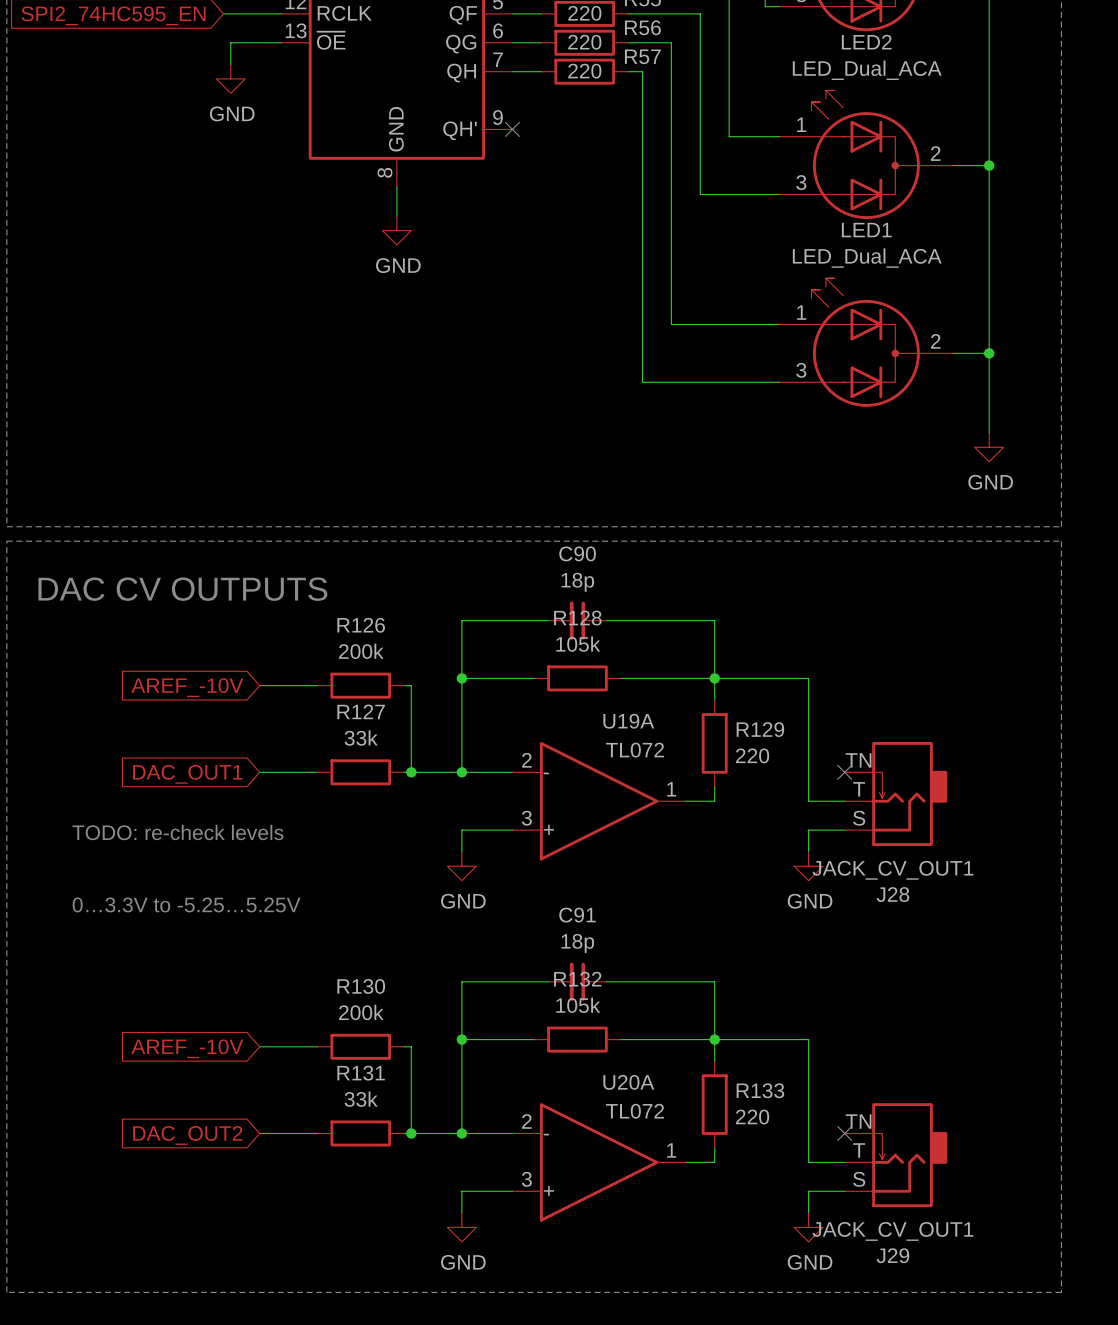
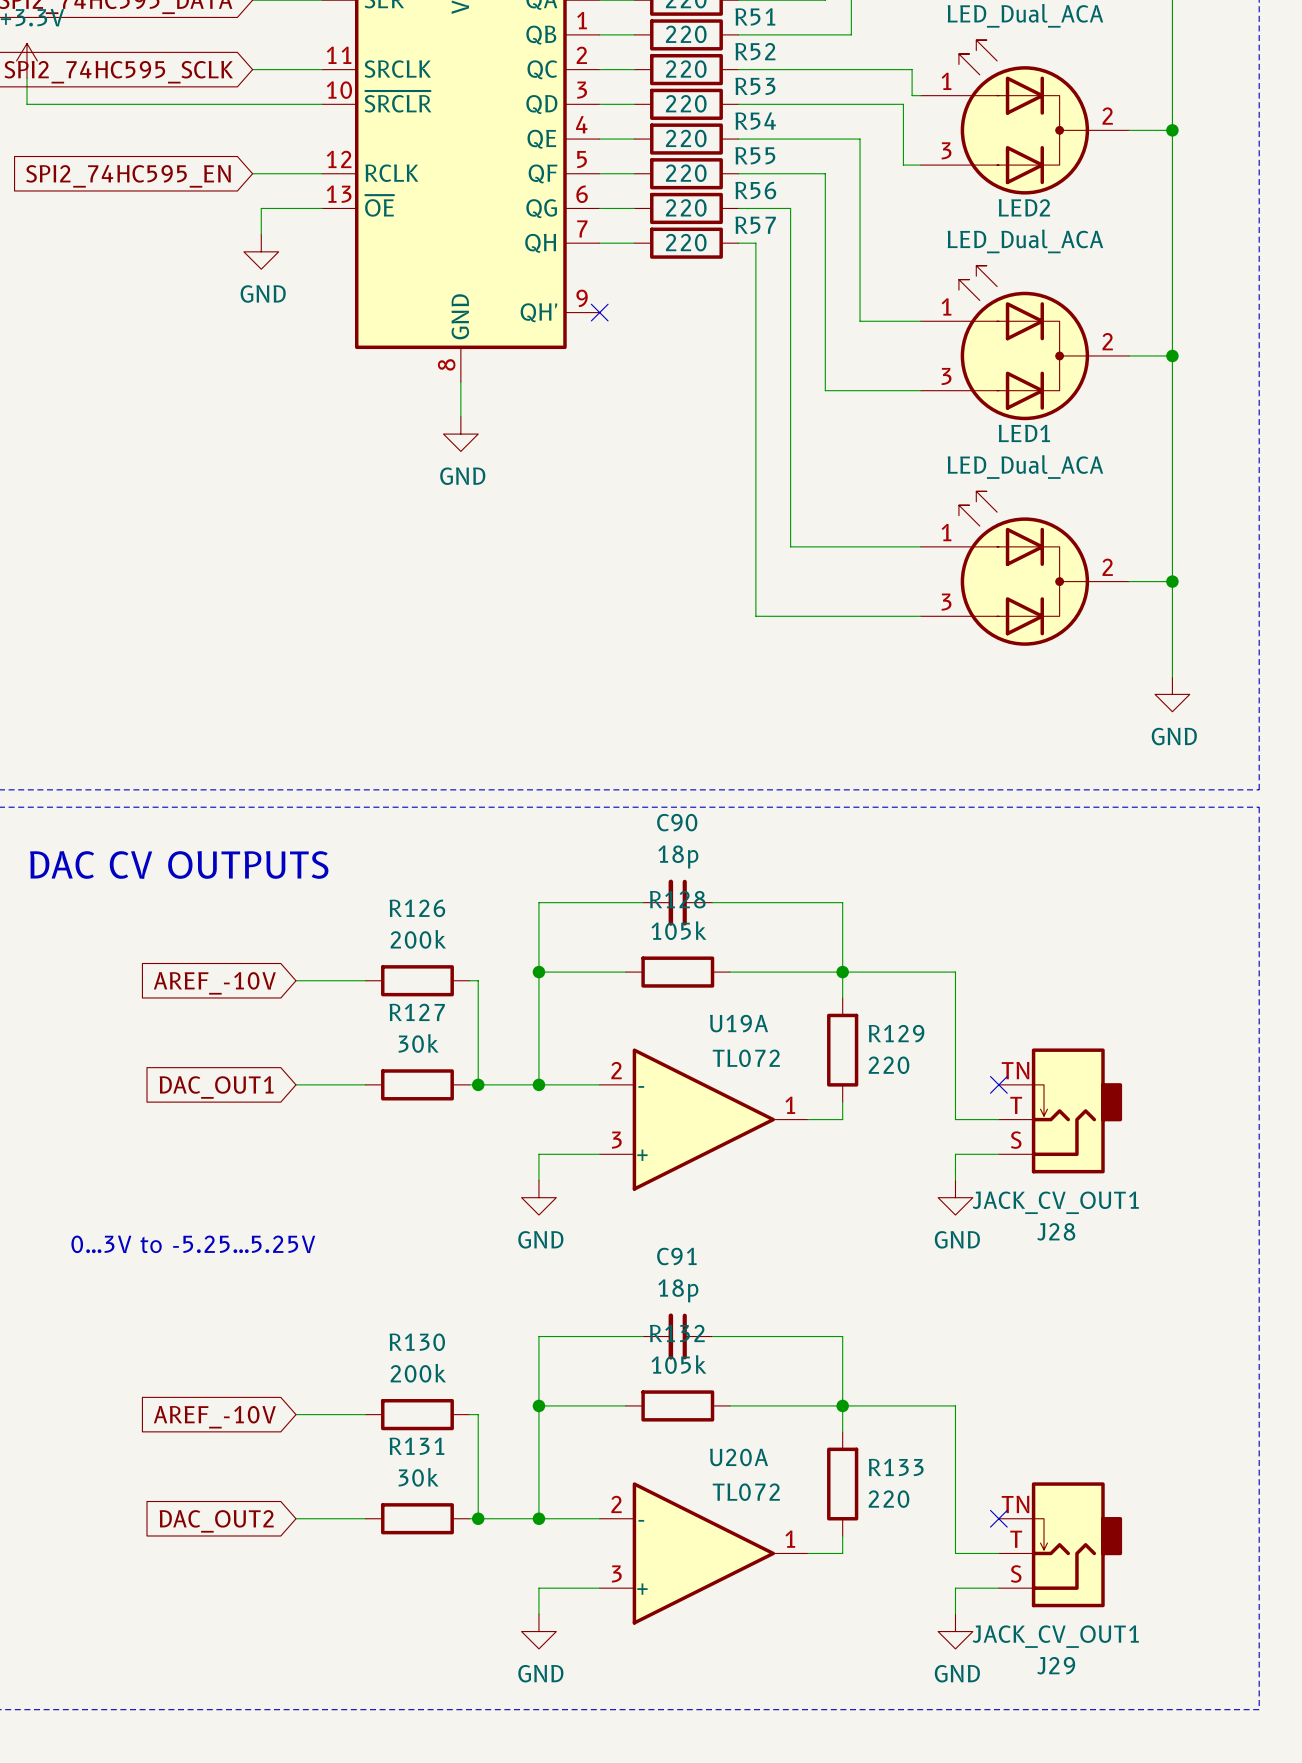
R127 value: 33k (361, 737) -> 30k (418, 1043)
text: TODO: re-check levels (177, 832) -> none
text: 0…3.3V to -5.25…5.25V (186, 904) -> 0…3V to -5.25…5.25V (193, 1244)
R131 value: 33k (361, 1099) -> 30k (418, 1477)

